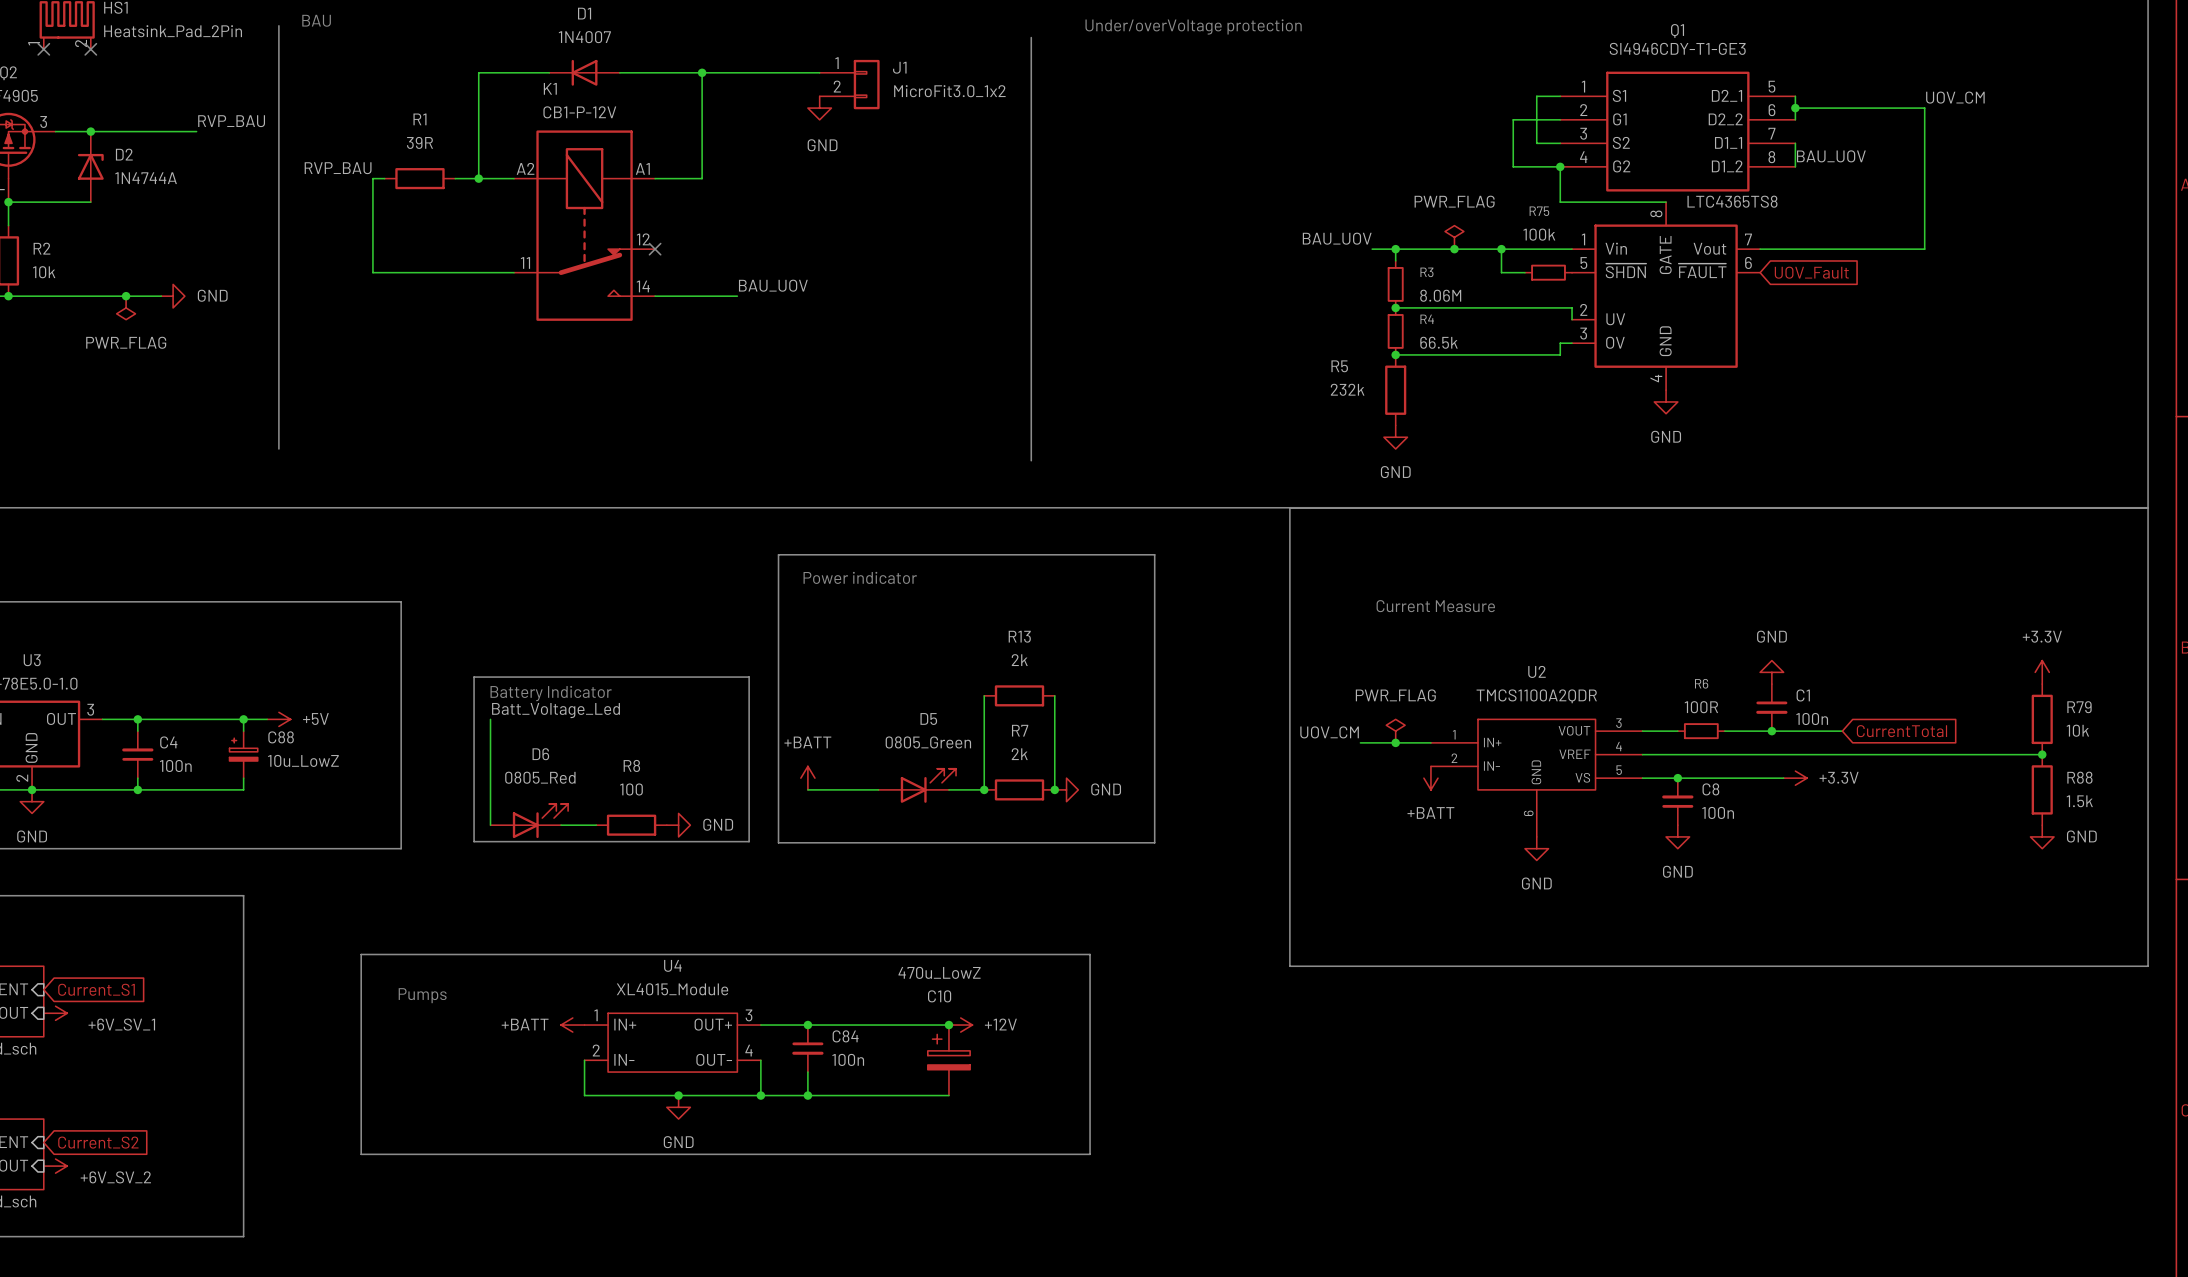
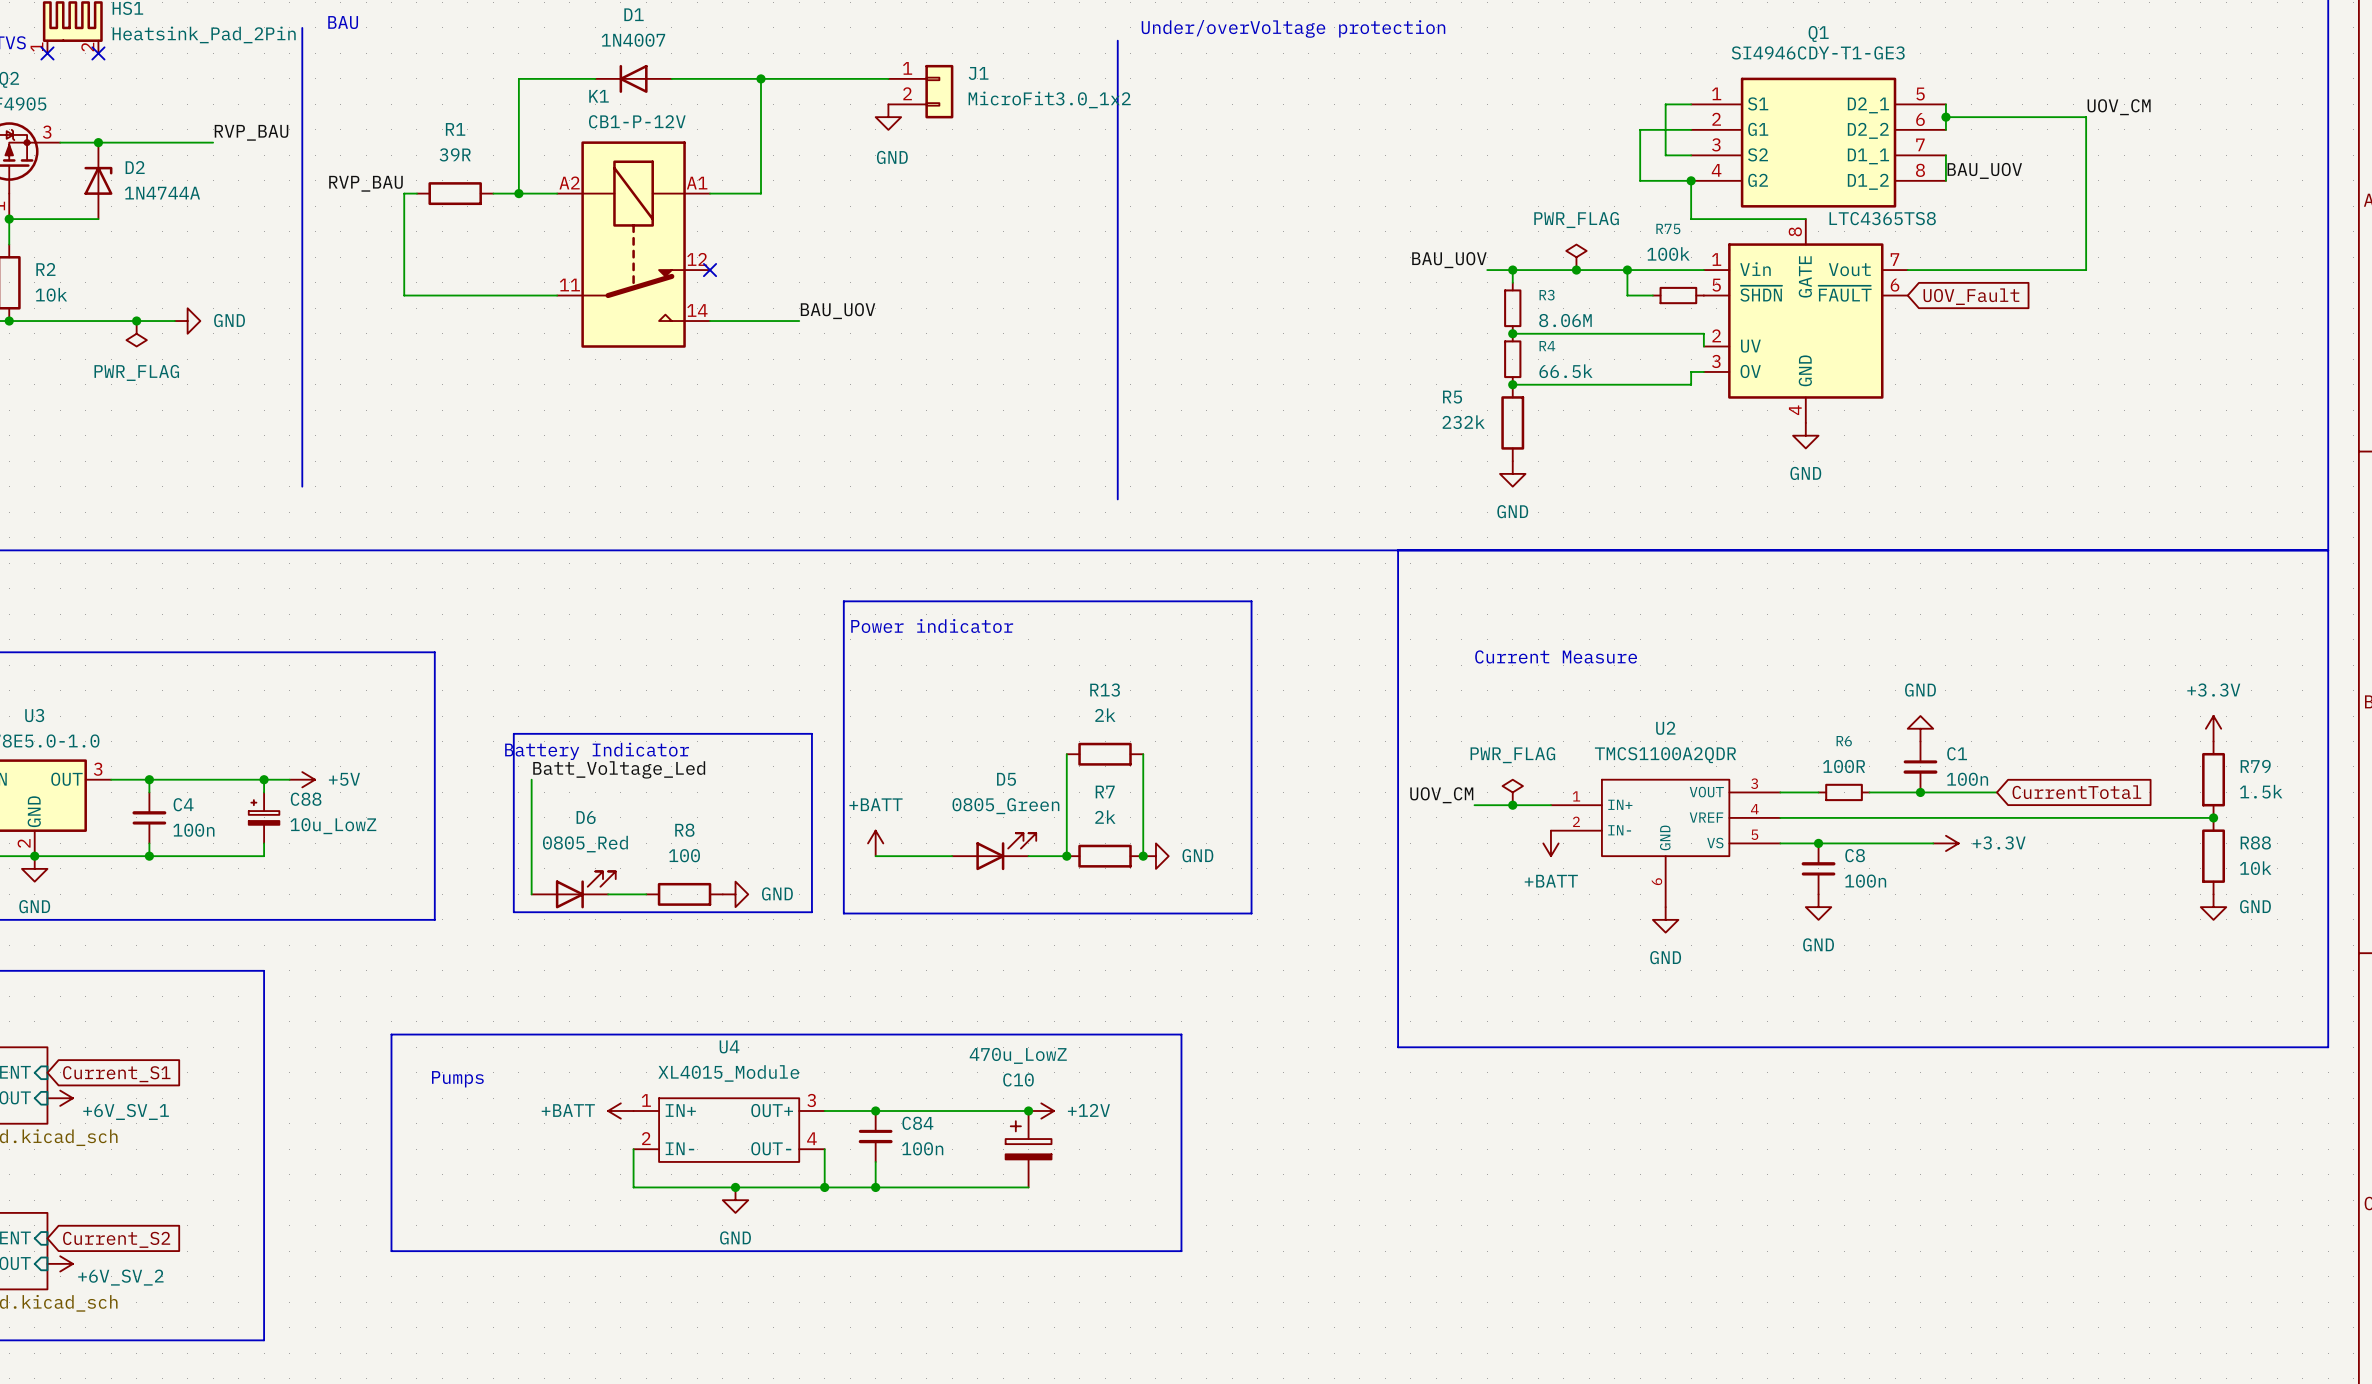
R79 value: 10k (2077, 730) -> 1.5k (2261, 791)
R88 value: 1.5k (2079, 801) -> 10k (2255, 868)

